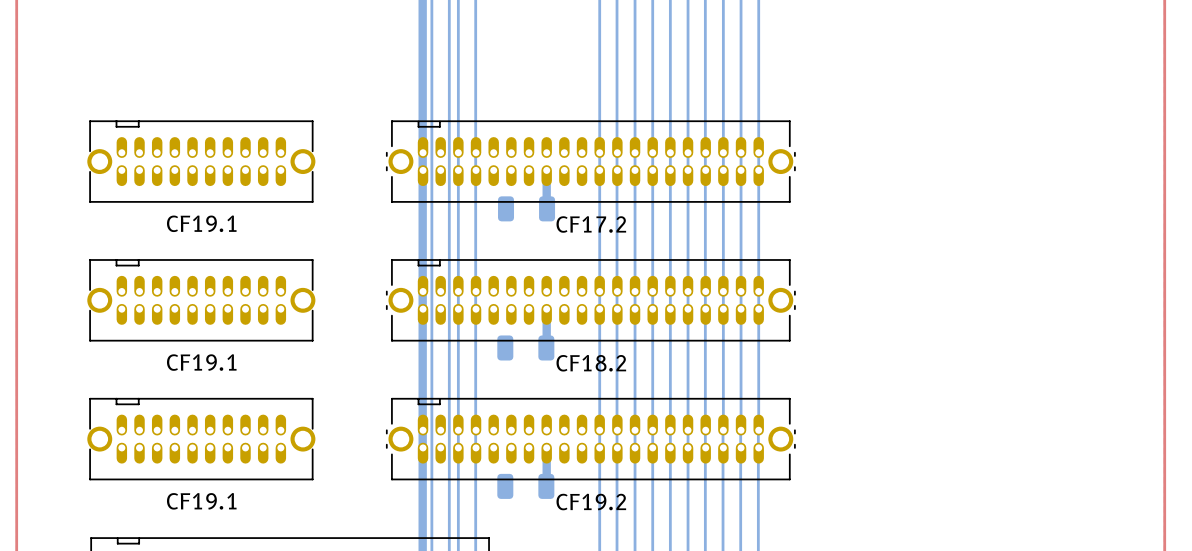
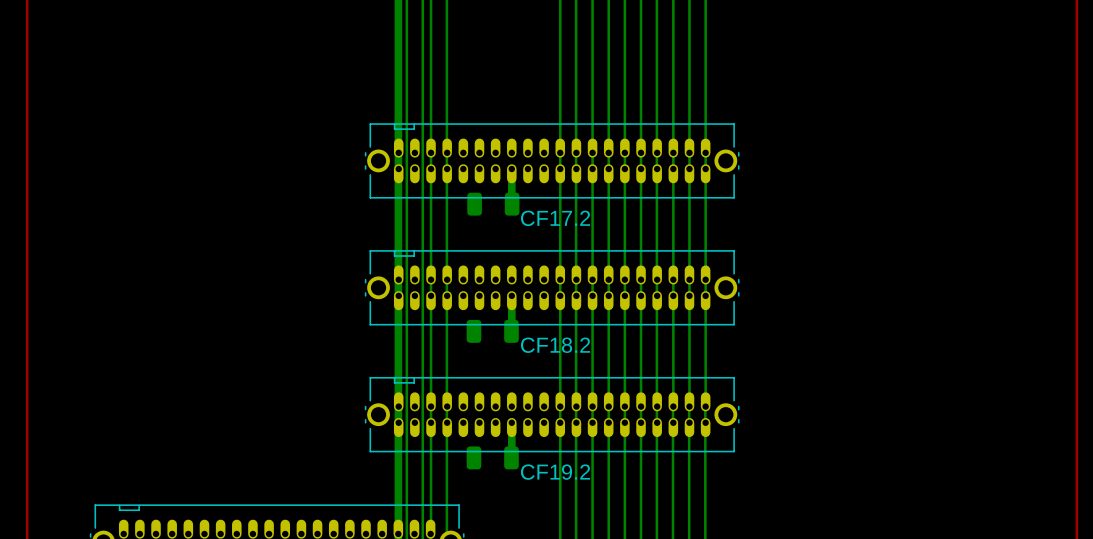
CF19.1: (201, 161) -> none
CF19.1: (201, 300) -> none
CF19.1: (201, 439) -> none

